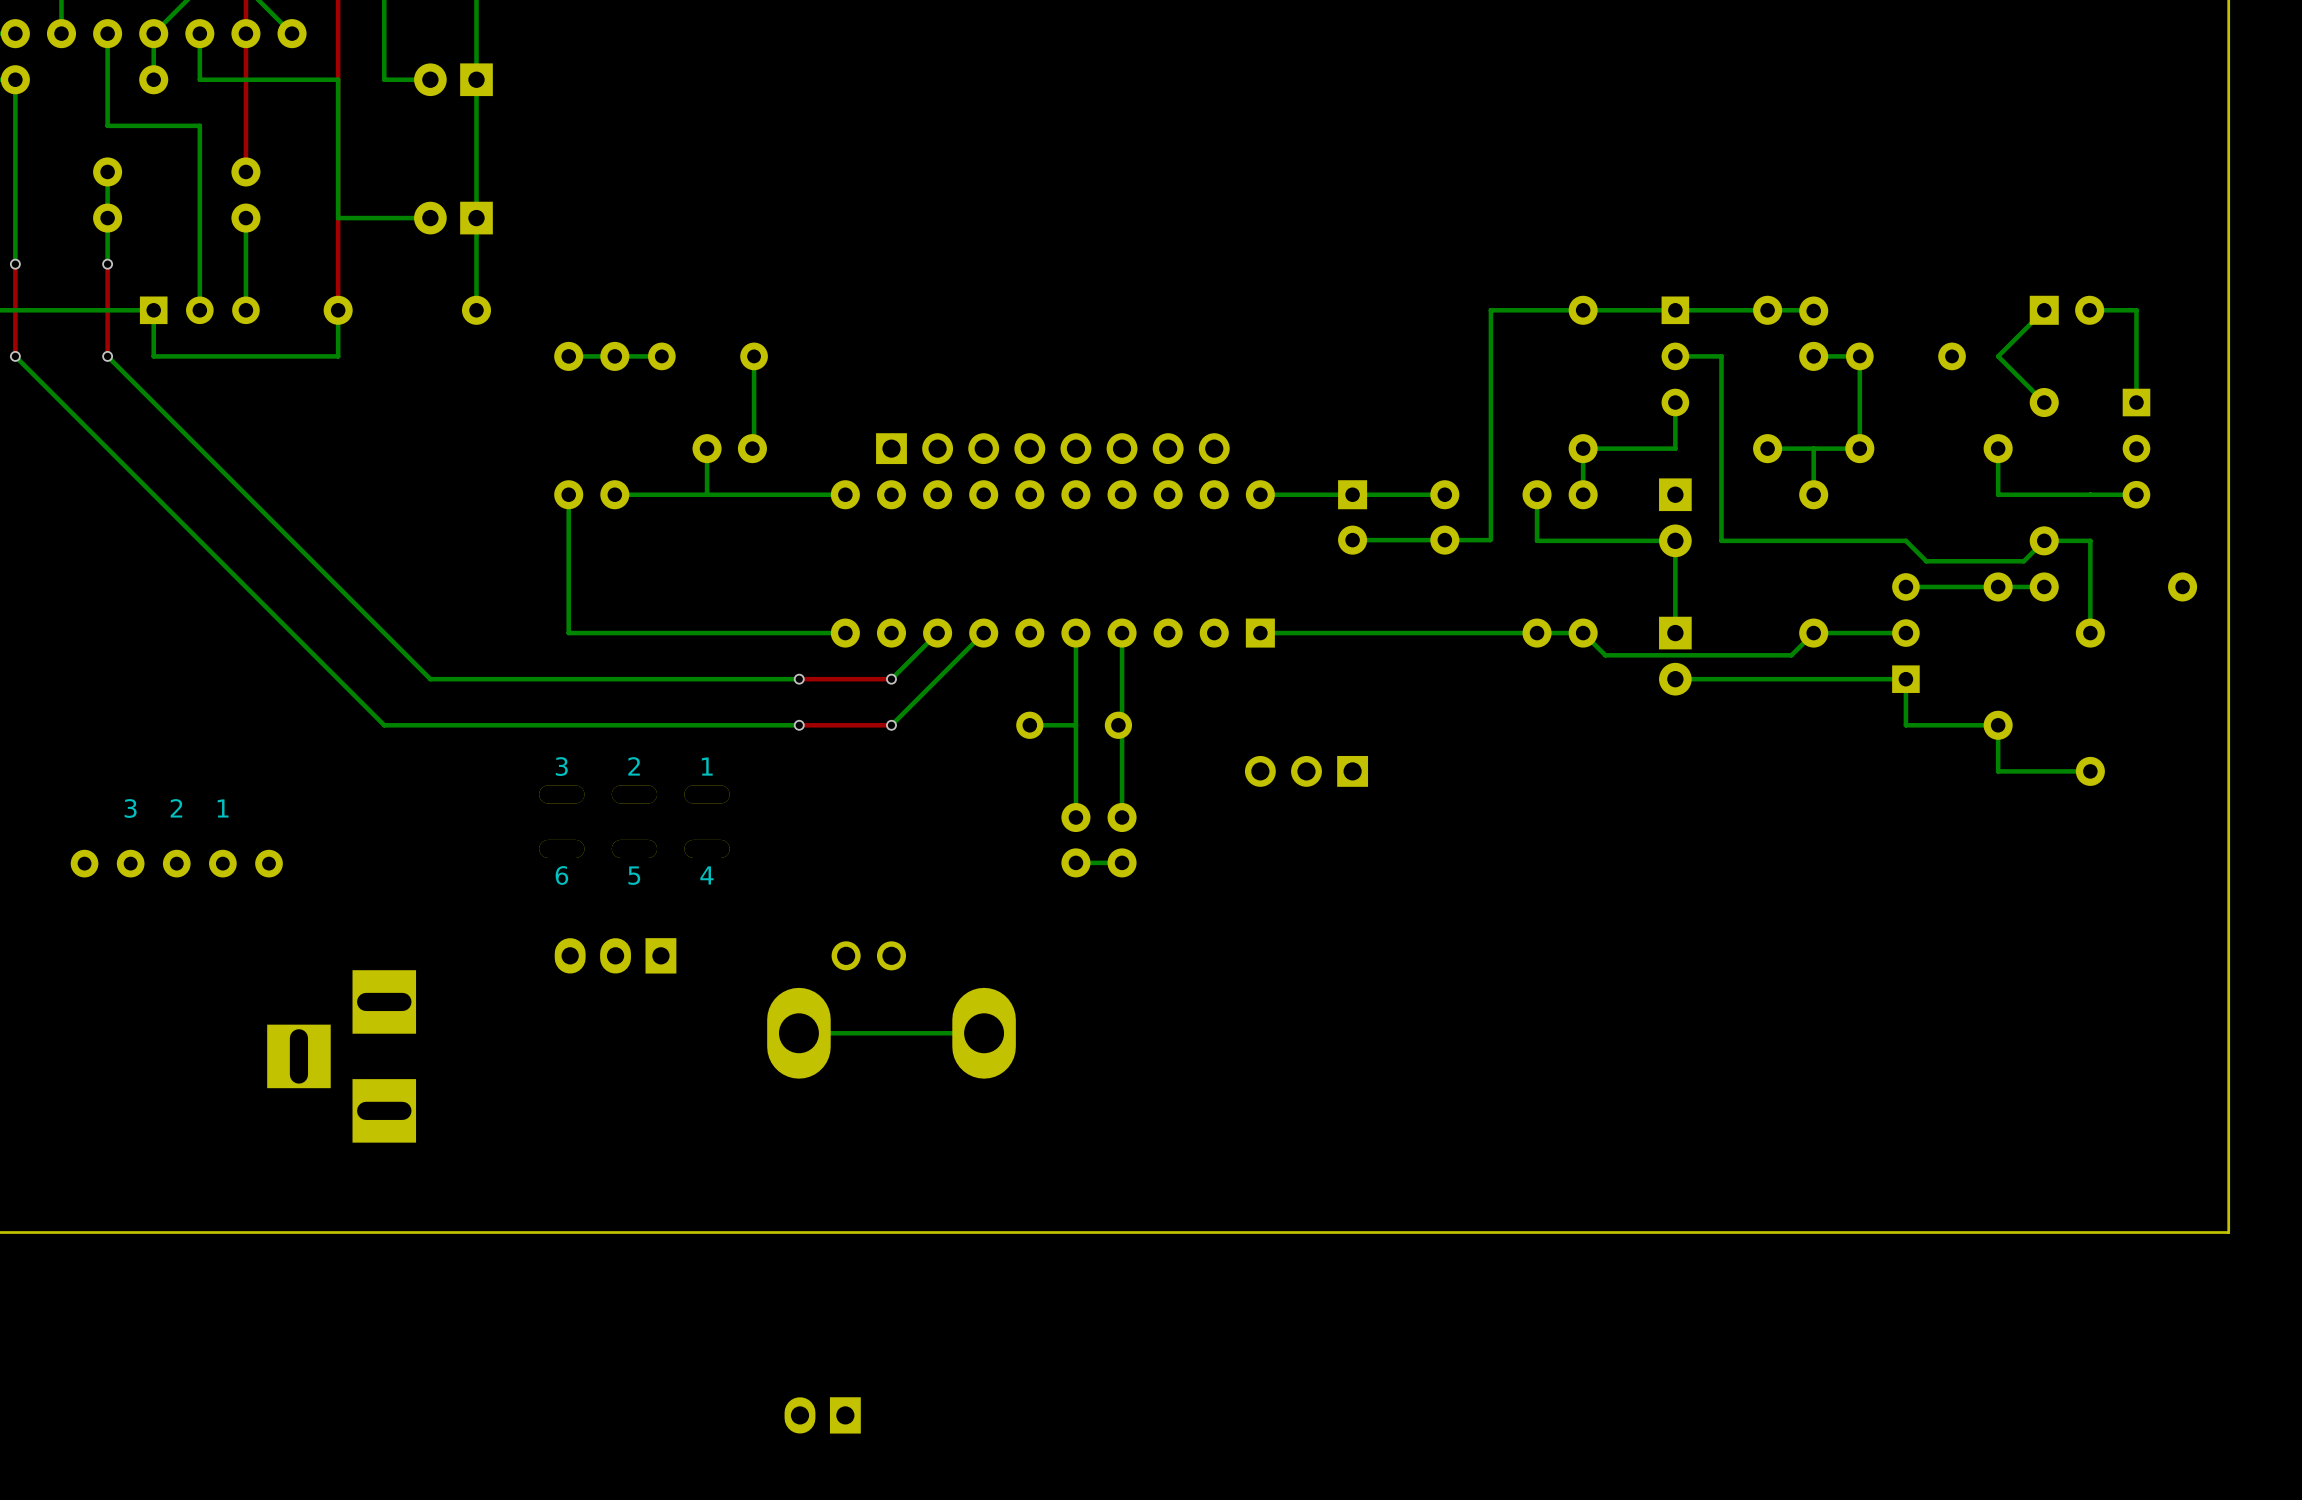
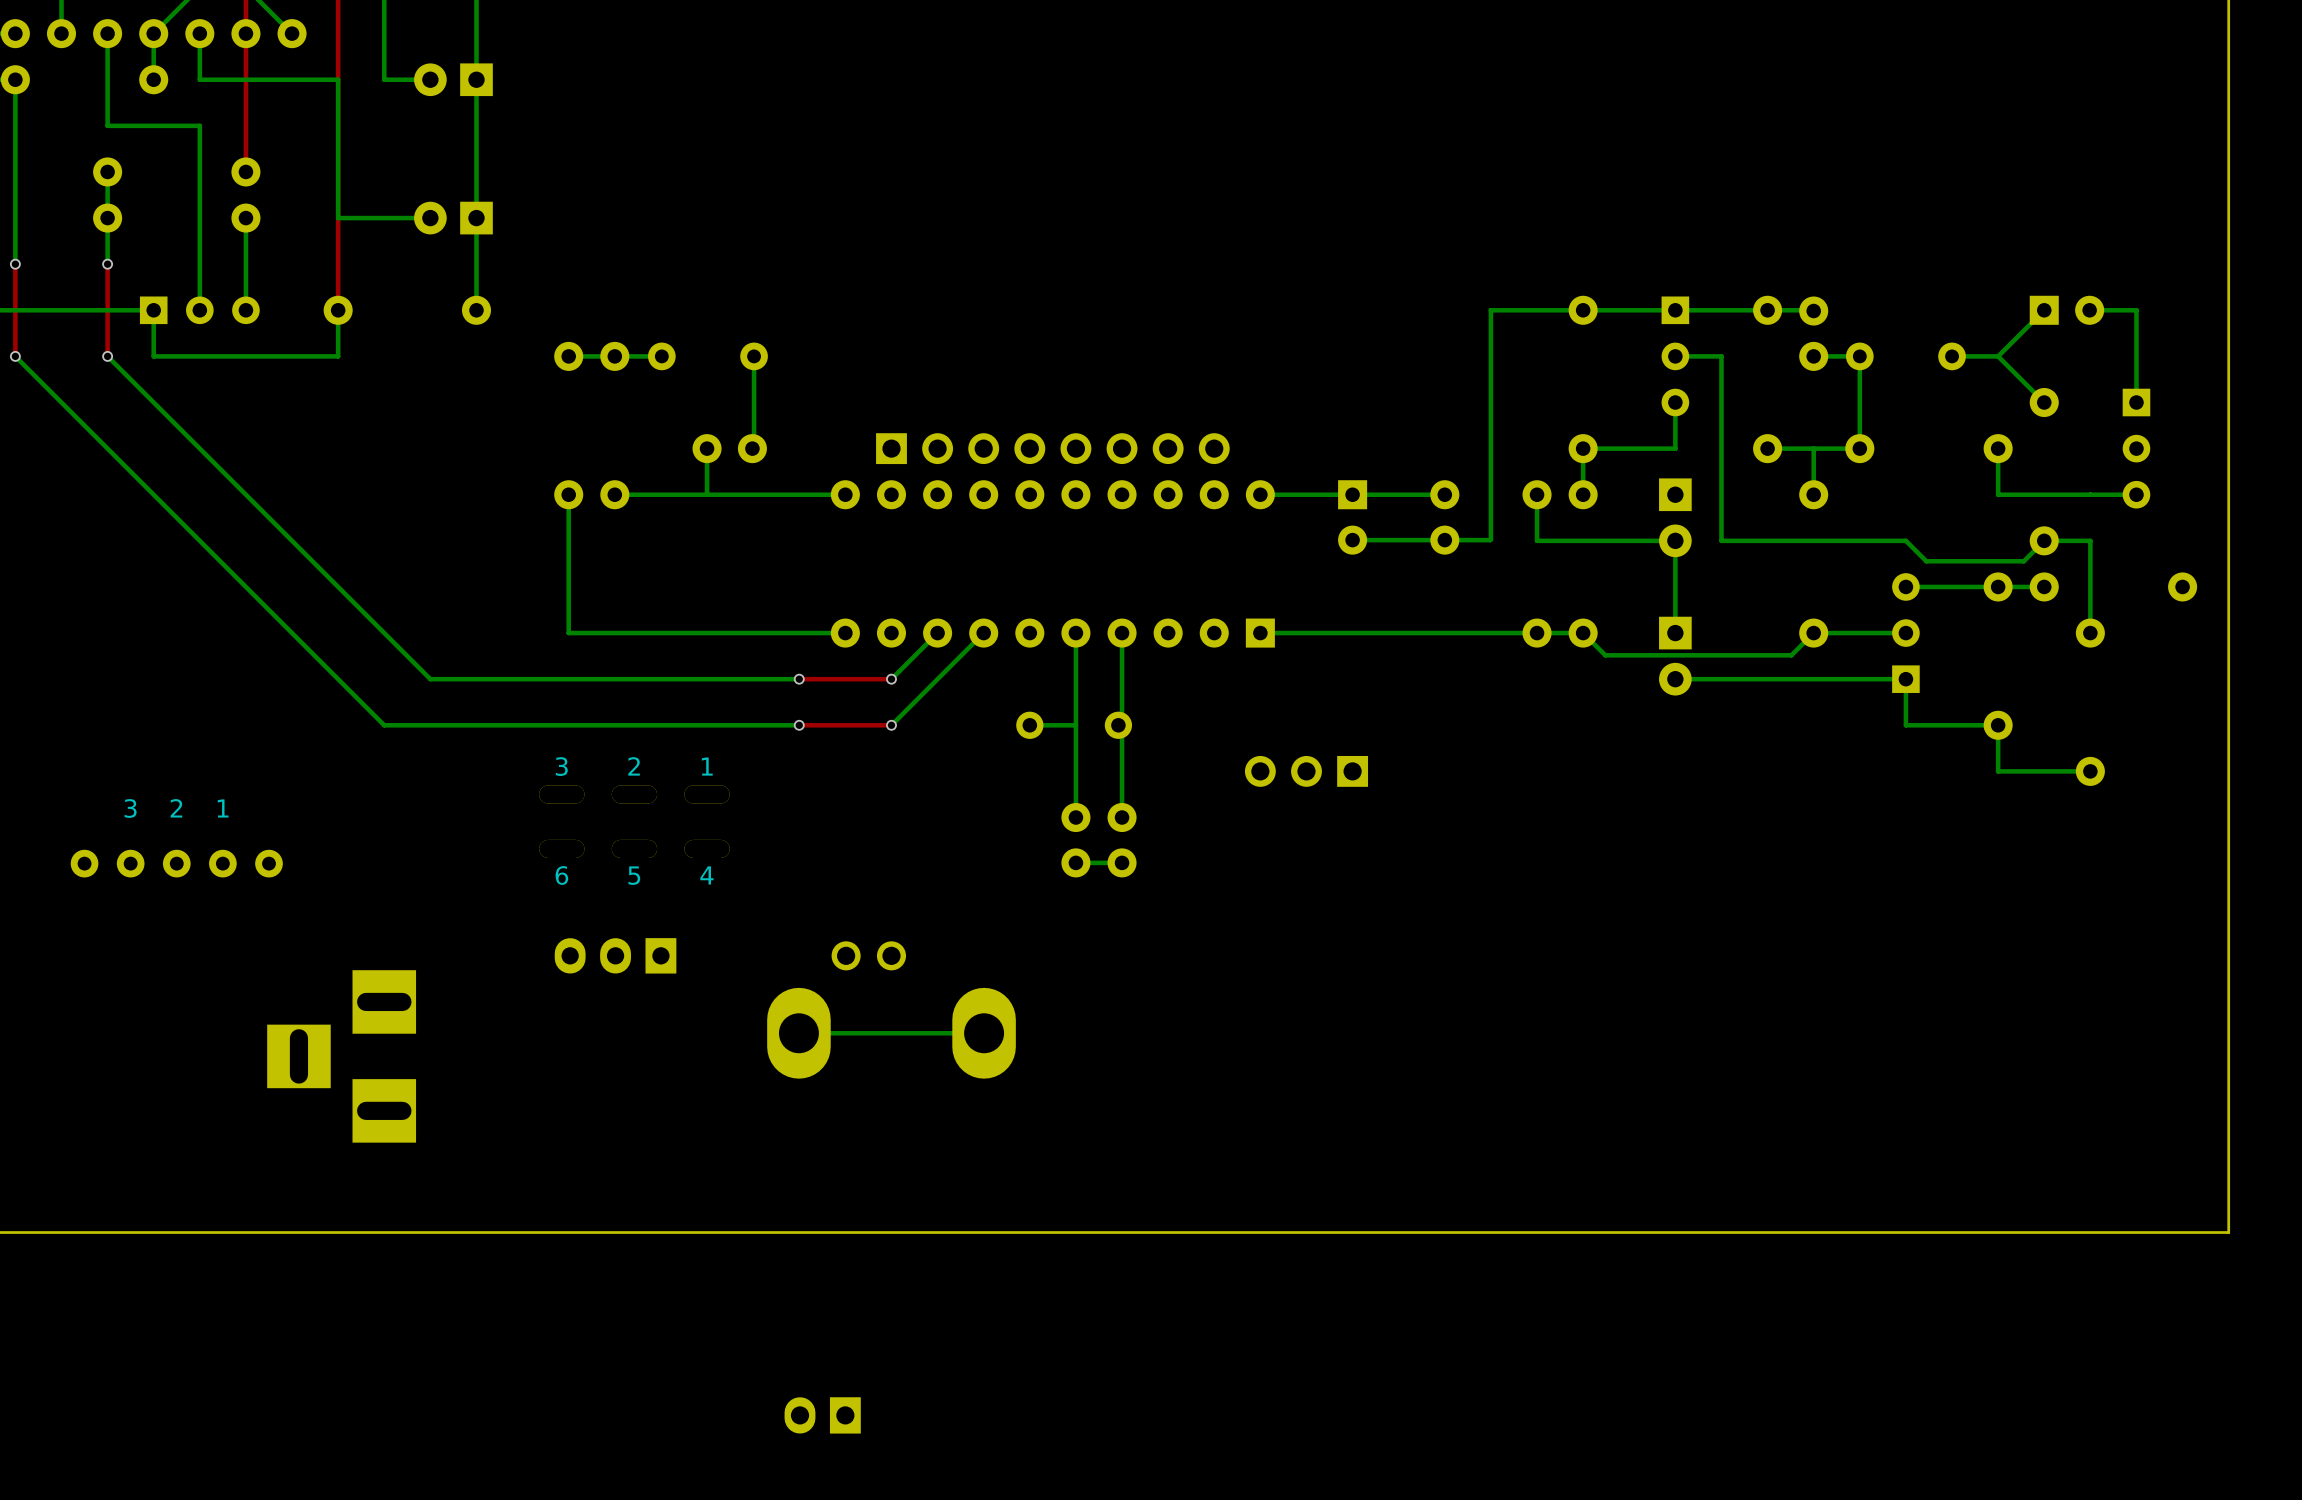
bottom track: none -> (1998, 356) (1952, 356)

